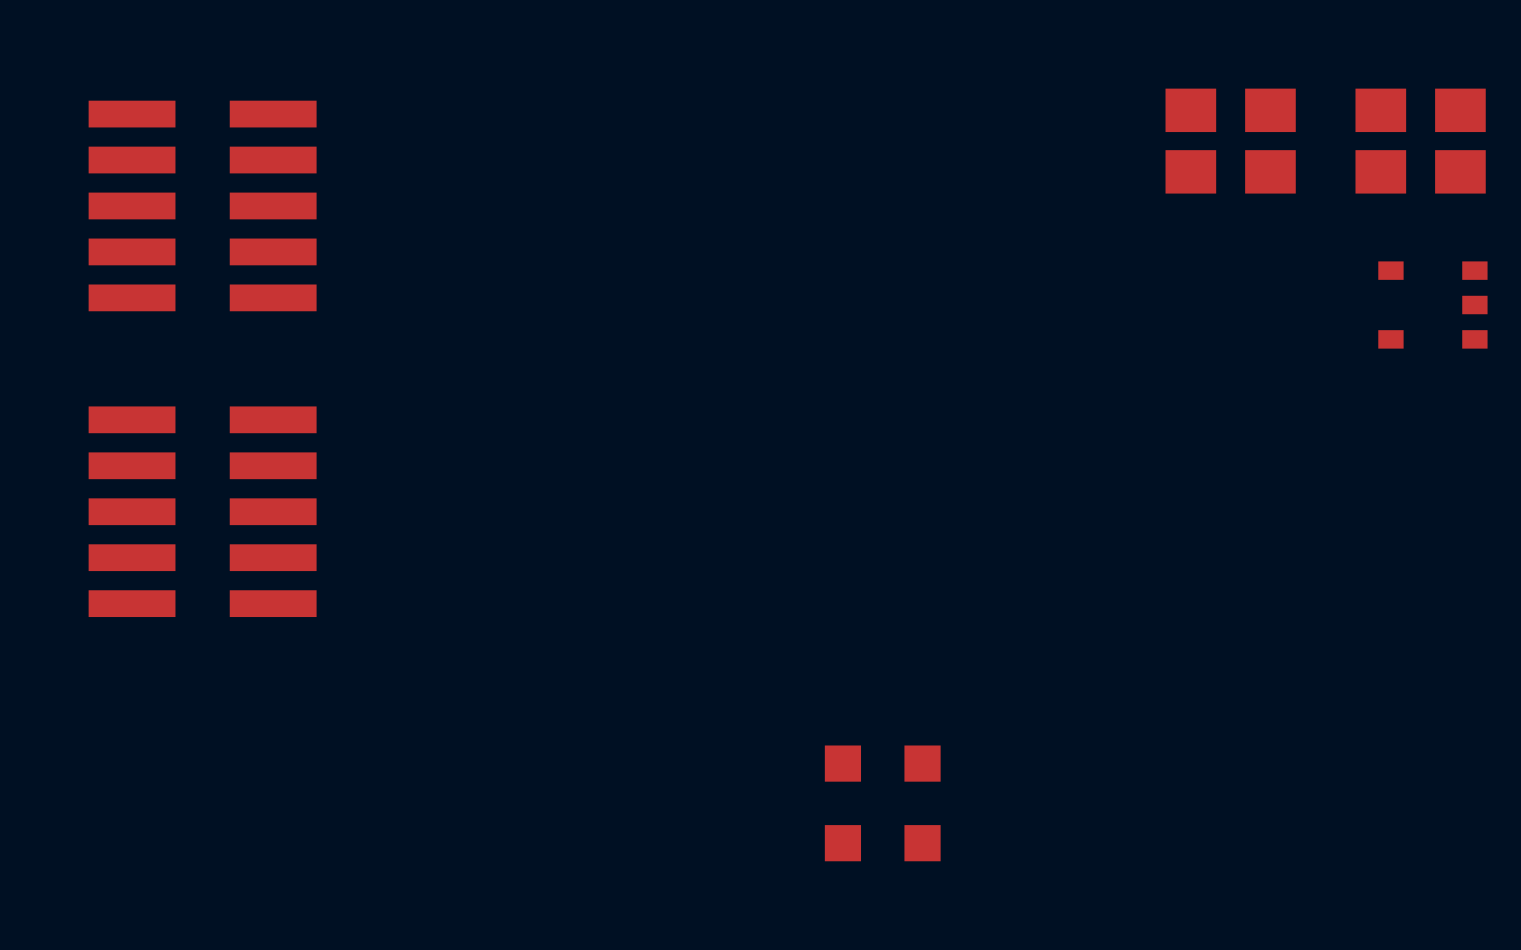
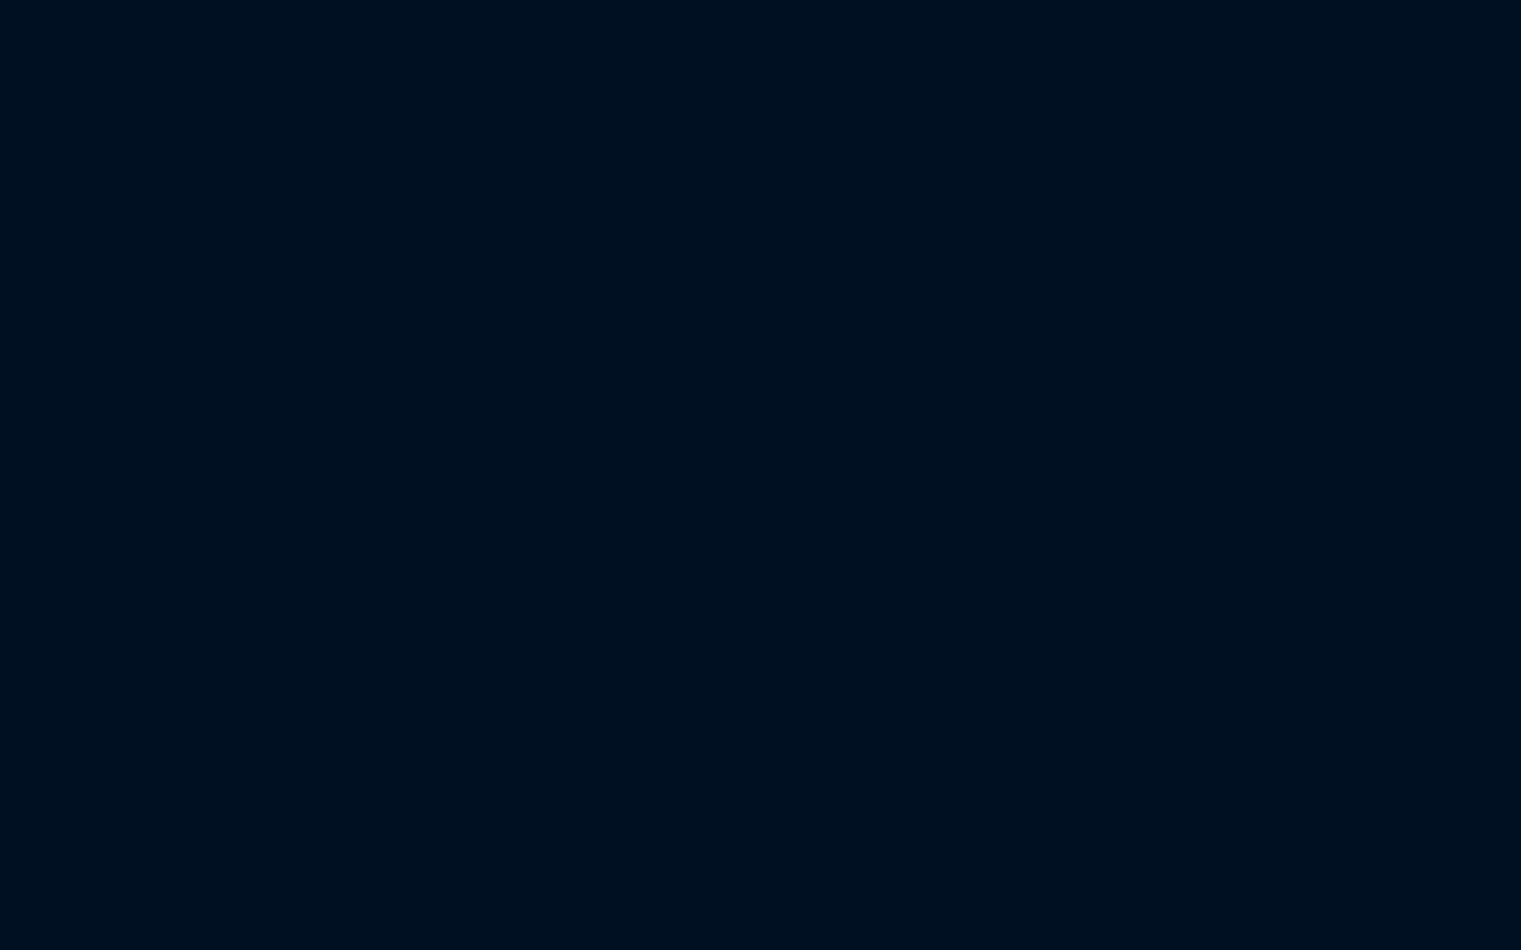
part: (1230, 141) -> none
part: (1420, 141) -> none
part: (202, 205) -> none
part: (1432, 305) -> none
part: (202, 511) -> none
part: (882, 803) -> none

